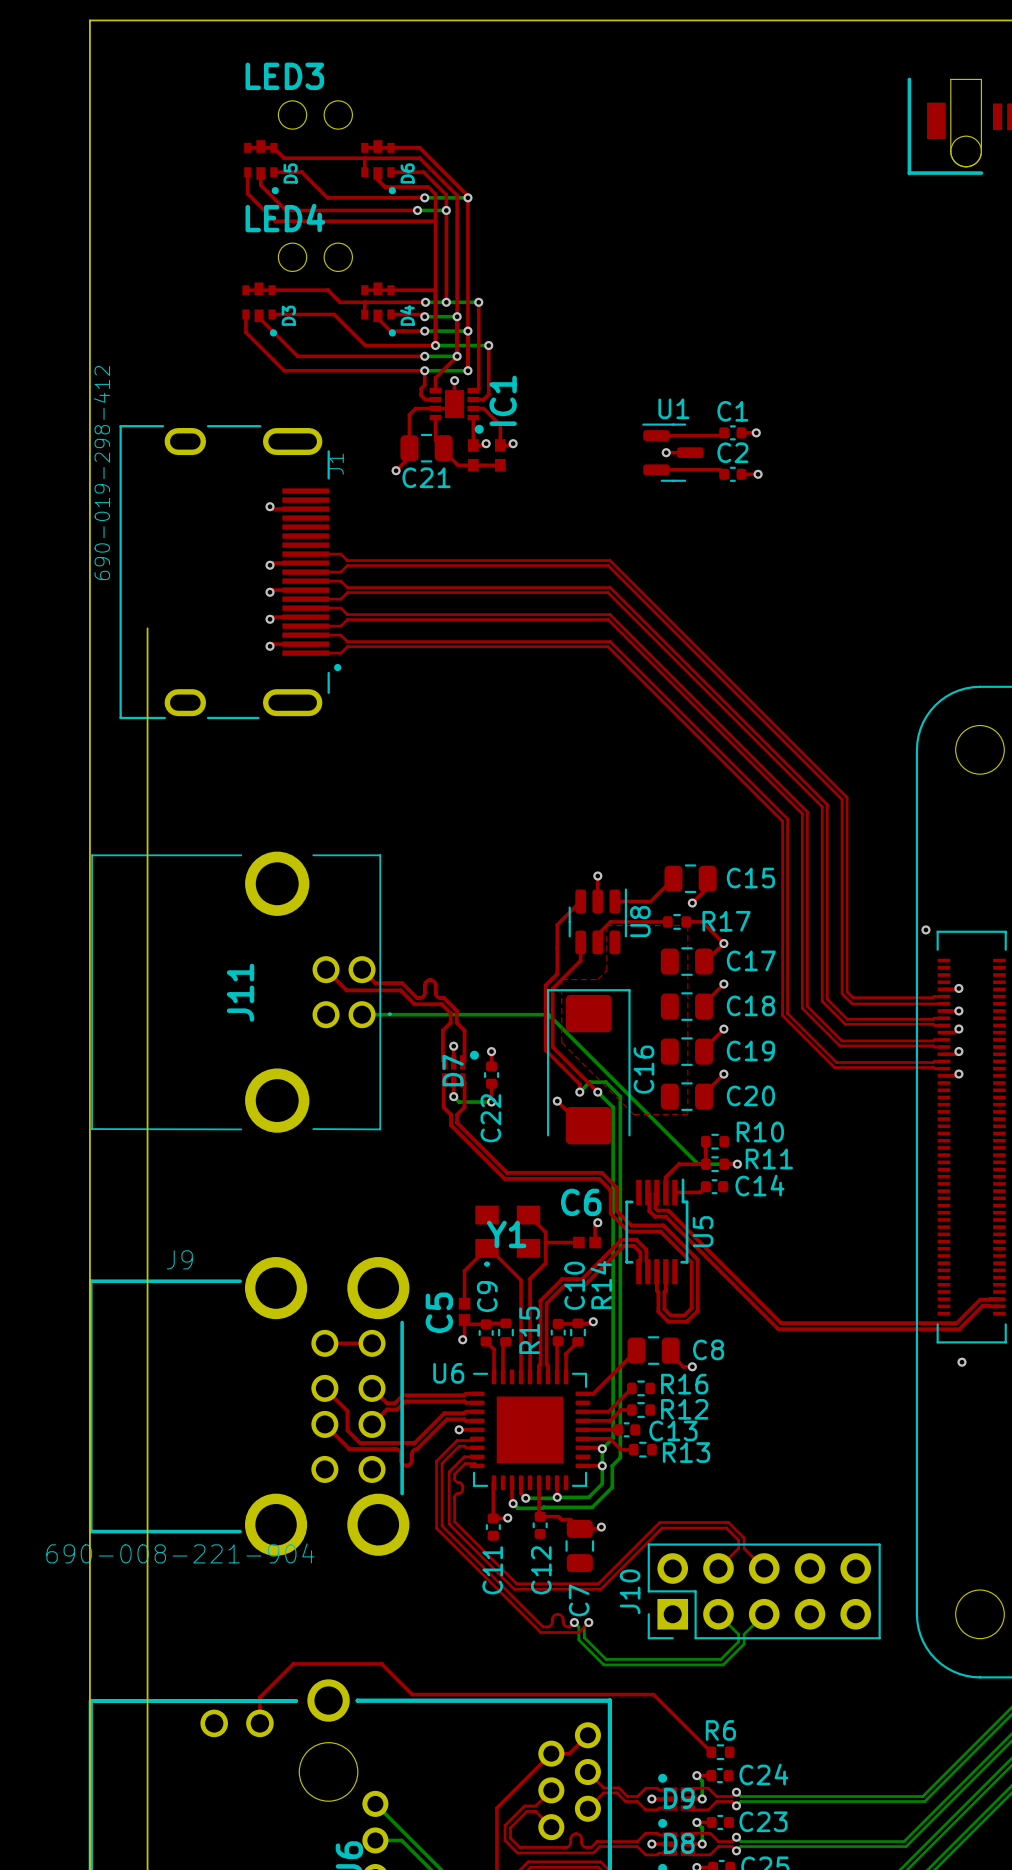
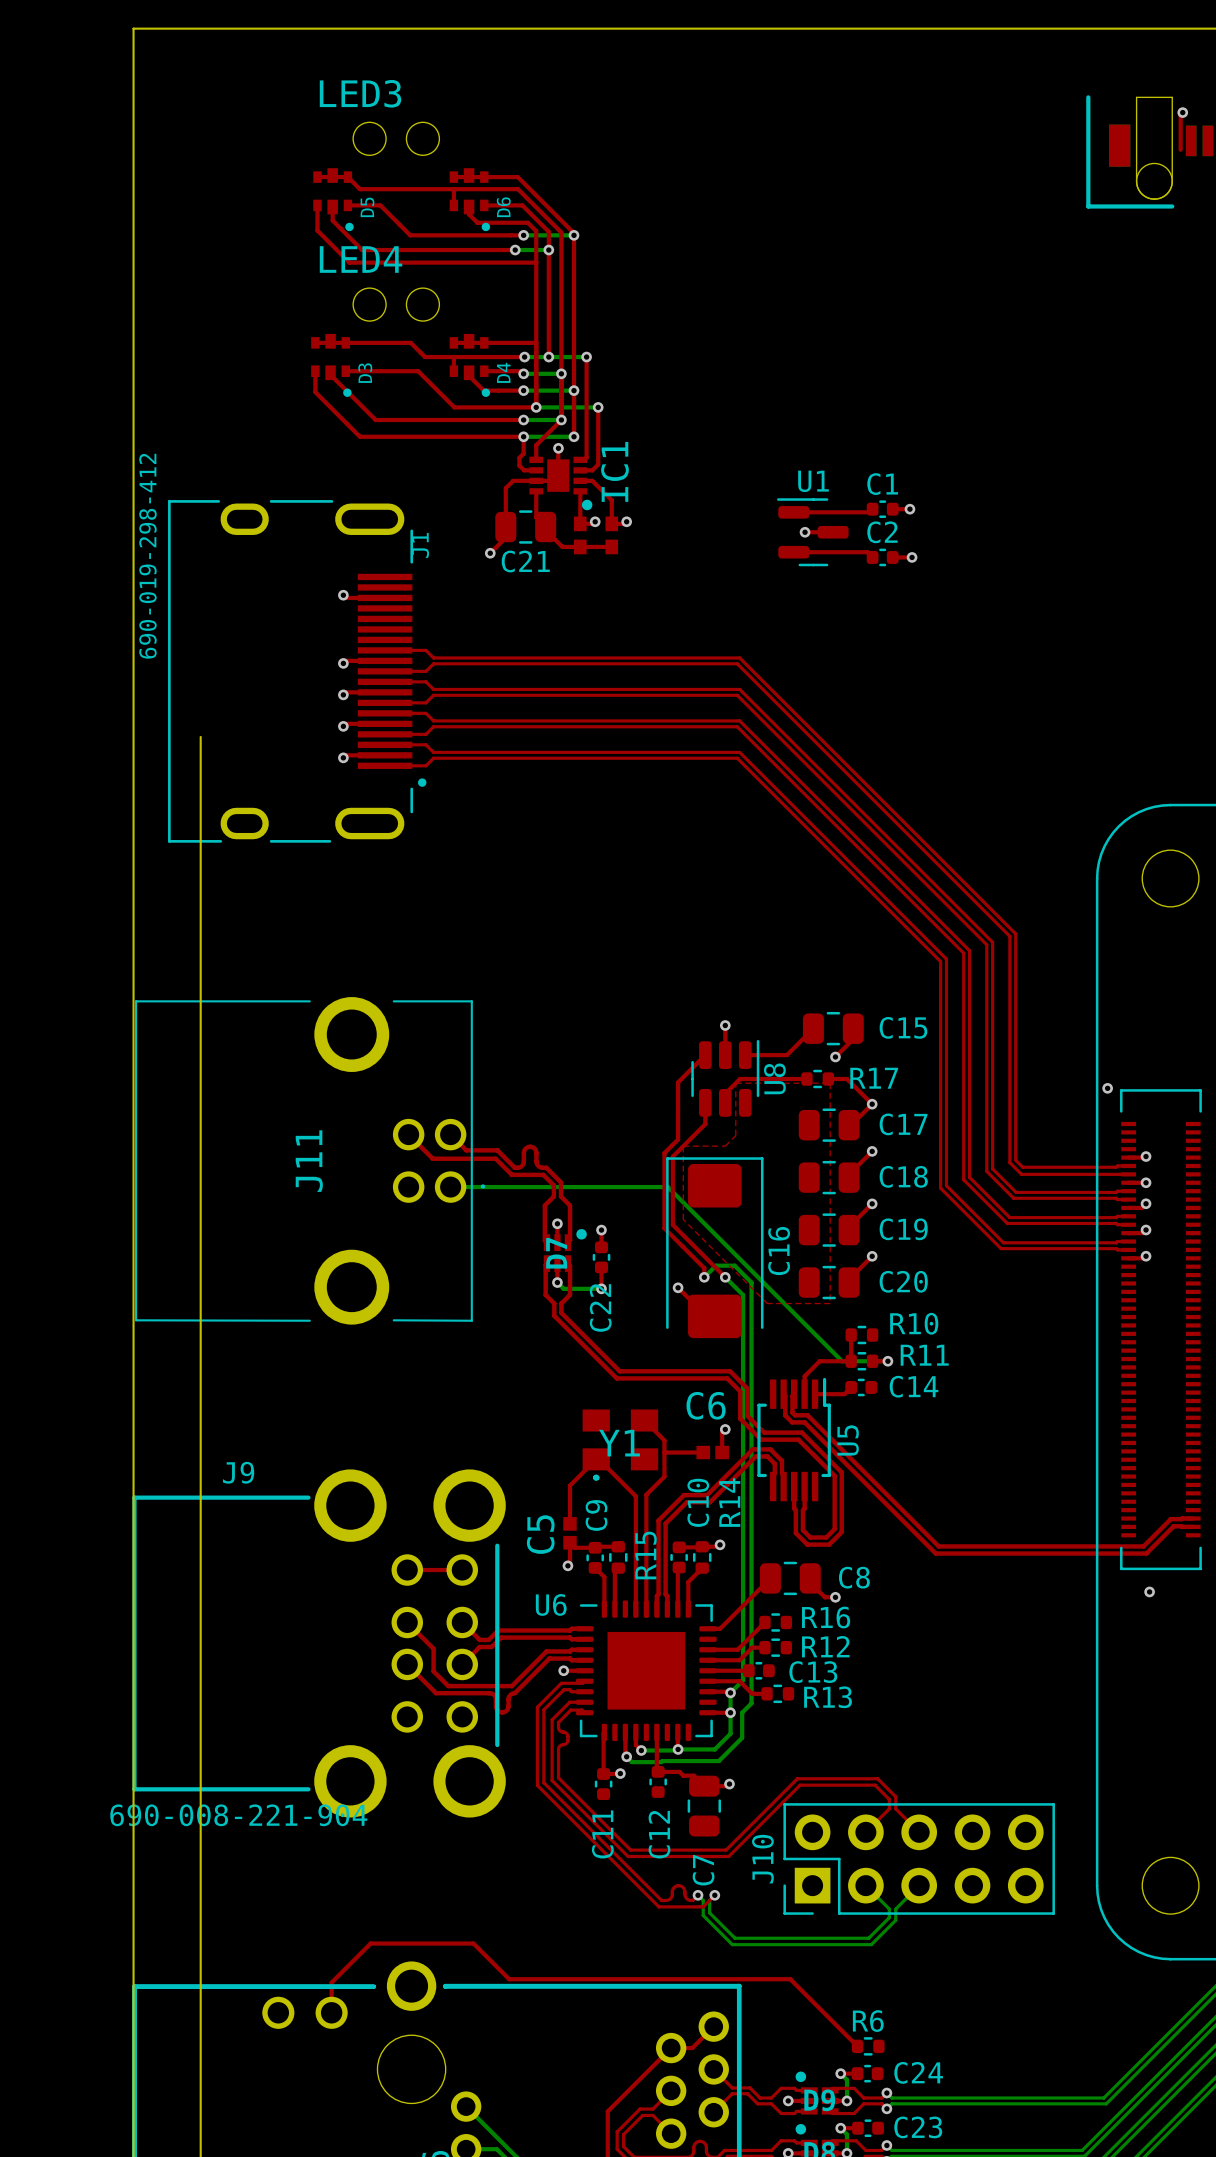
top track: none -> (1182, 112) (1180, 114) (1180, 149)
via: none -> (1182, 112)

